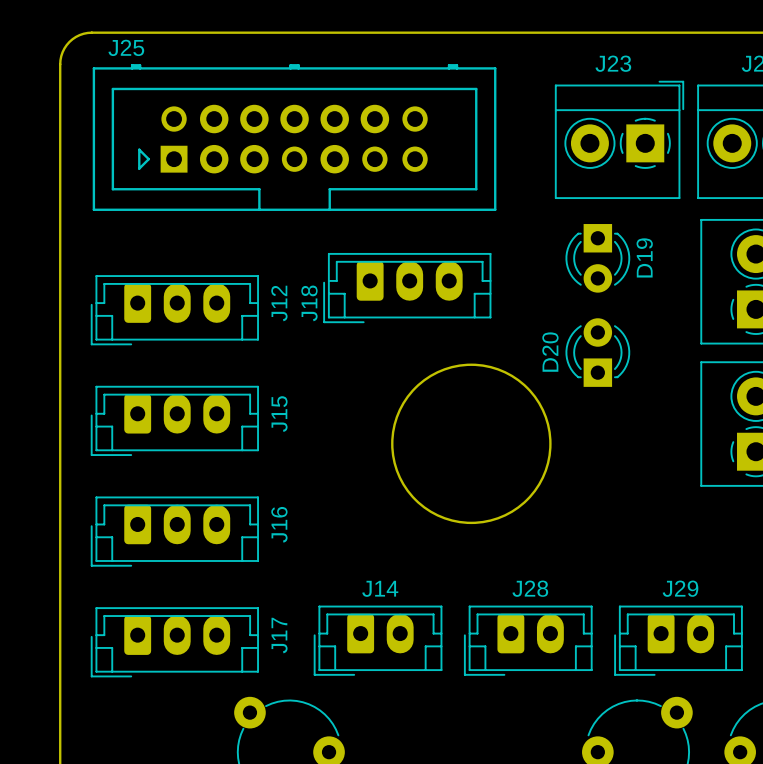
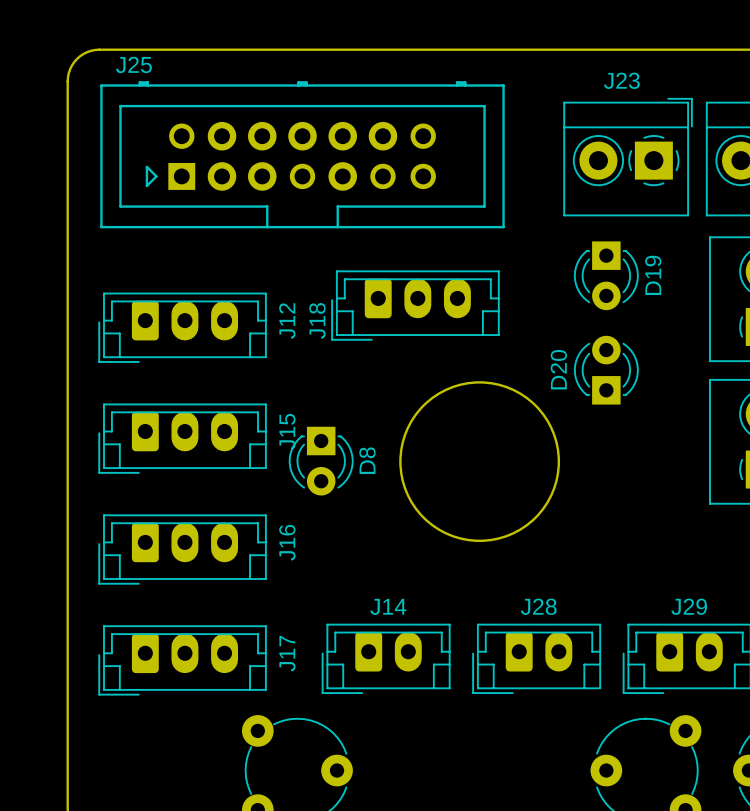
D8: none -> (321, 461)

